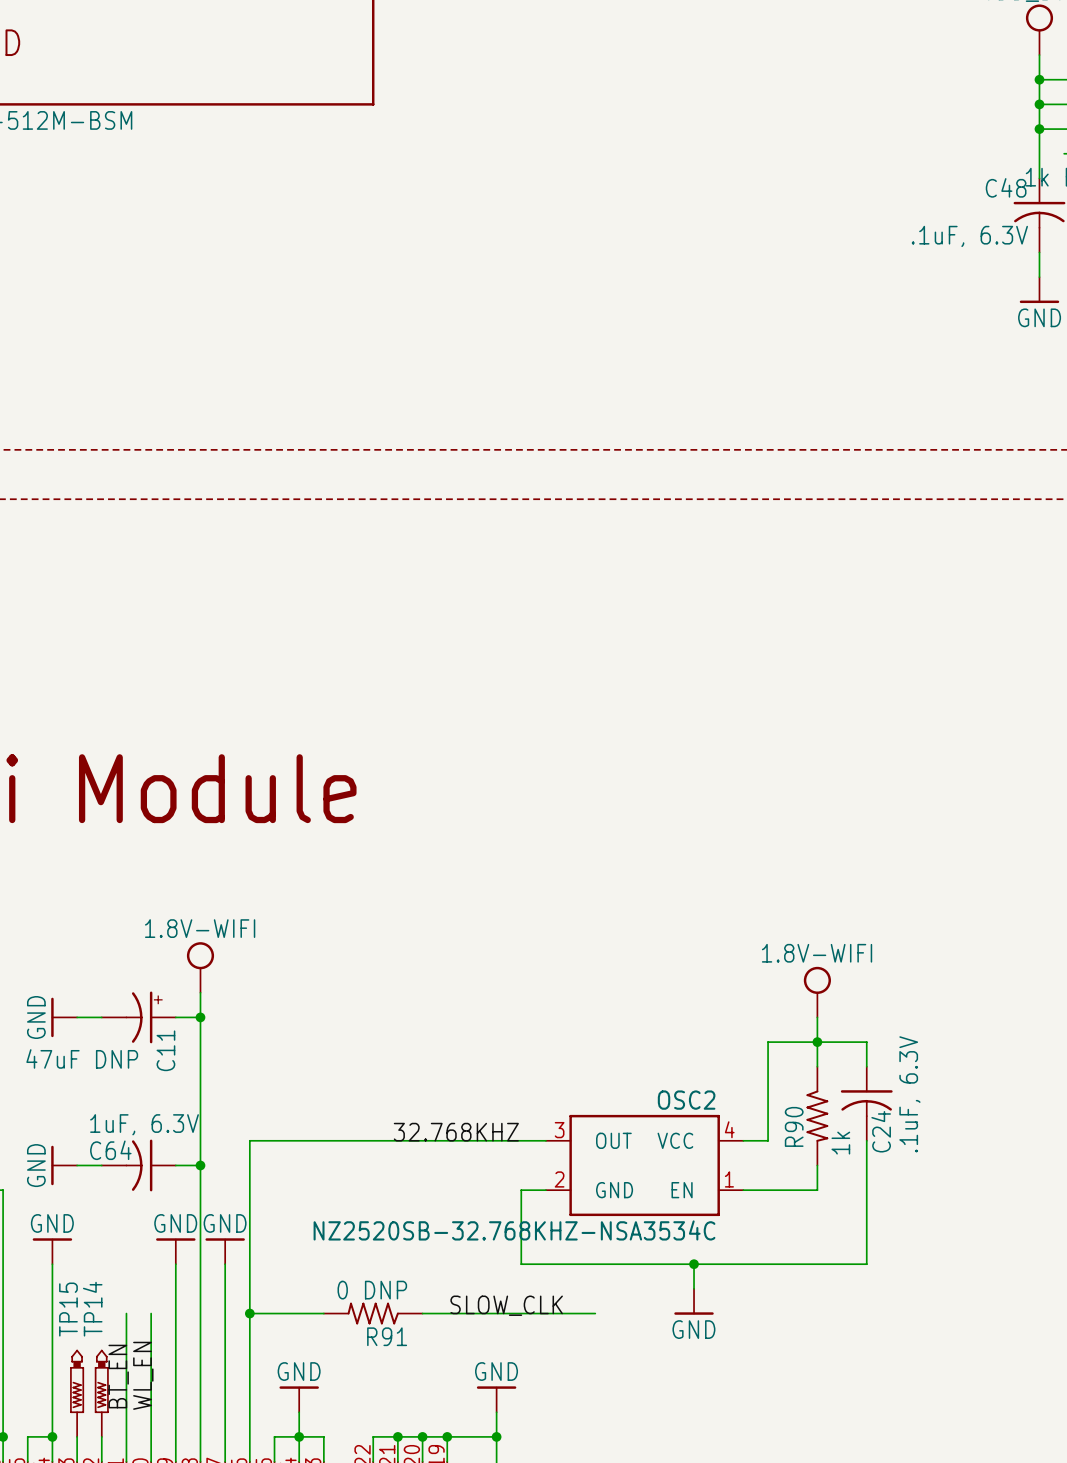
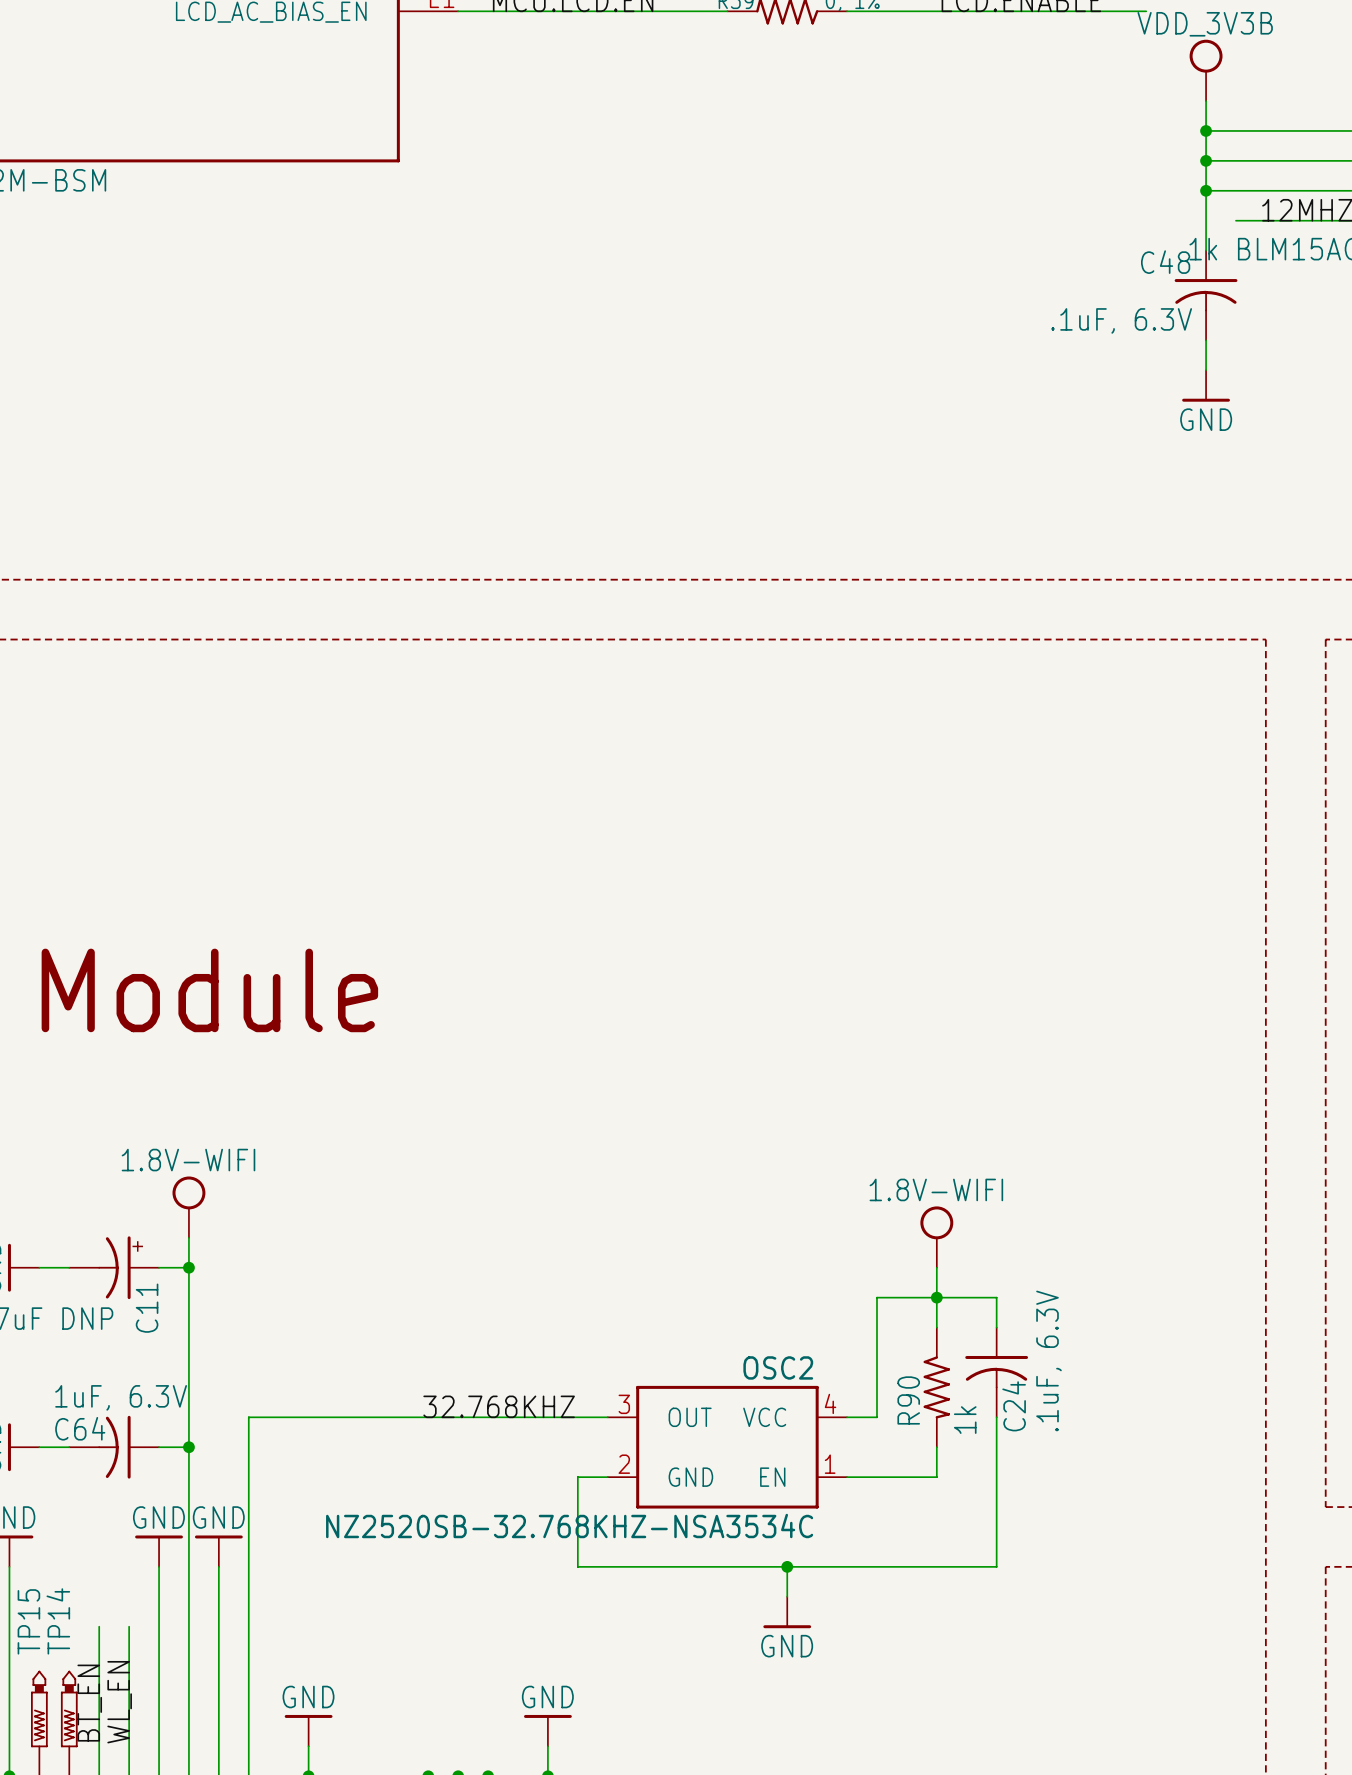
label: SLOW_CLK (506, 1305) -> none
wire: (249, 1313) (323, 1313) -> none
junction: (249, 1313) -> none
R91: 0 DNP (373, 1313) -> none
wire: (422, 1313) (595, 1313) -> none

